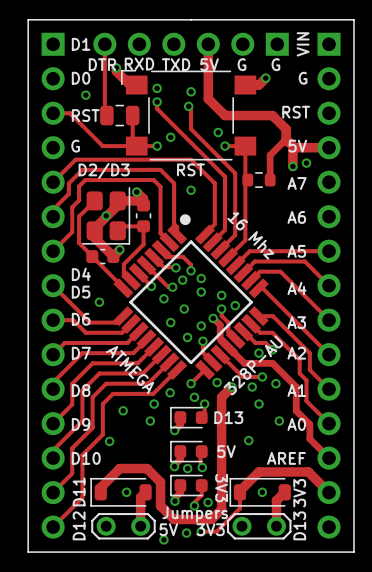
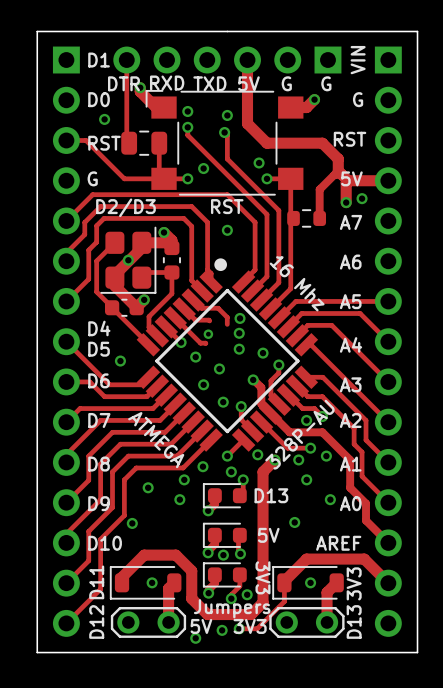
via: none -> (240, 318)
via: (175, 267) -> none
via: (191, 270) -> none
via: none -> (208, 334)
via: (182, 280) -> none
via: (172, 287) -> none
track: (221, 309) (221, 315) (228, 322) -> (278, 365) (278, 372) (270, 380) (270, 384)
via: (221, 309) -> none
via: (201, 326) -> none

